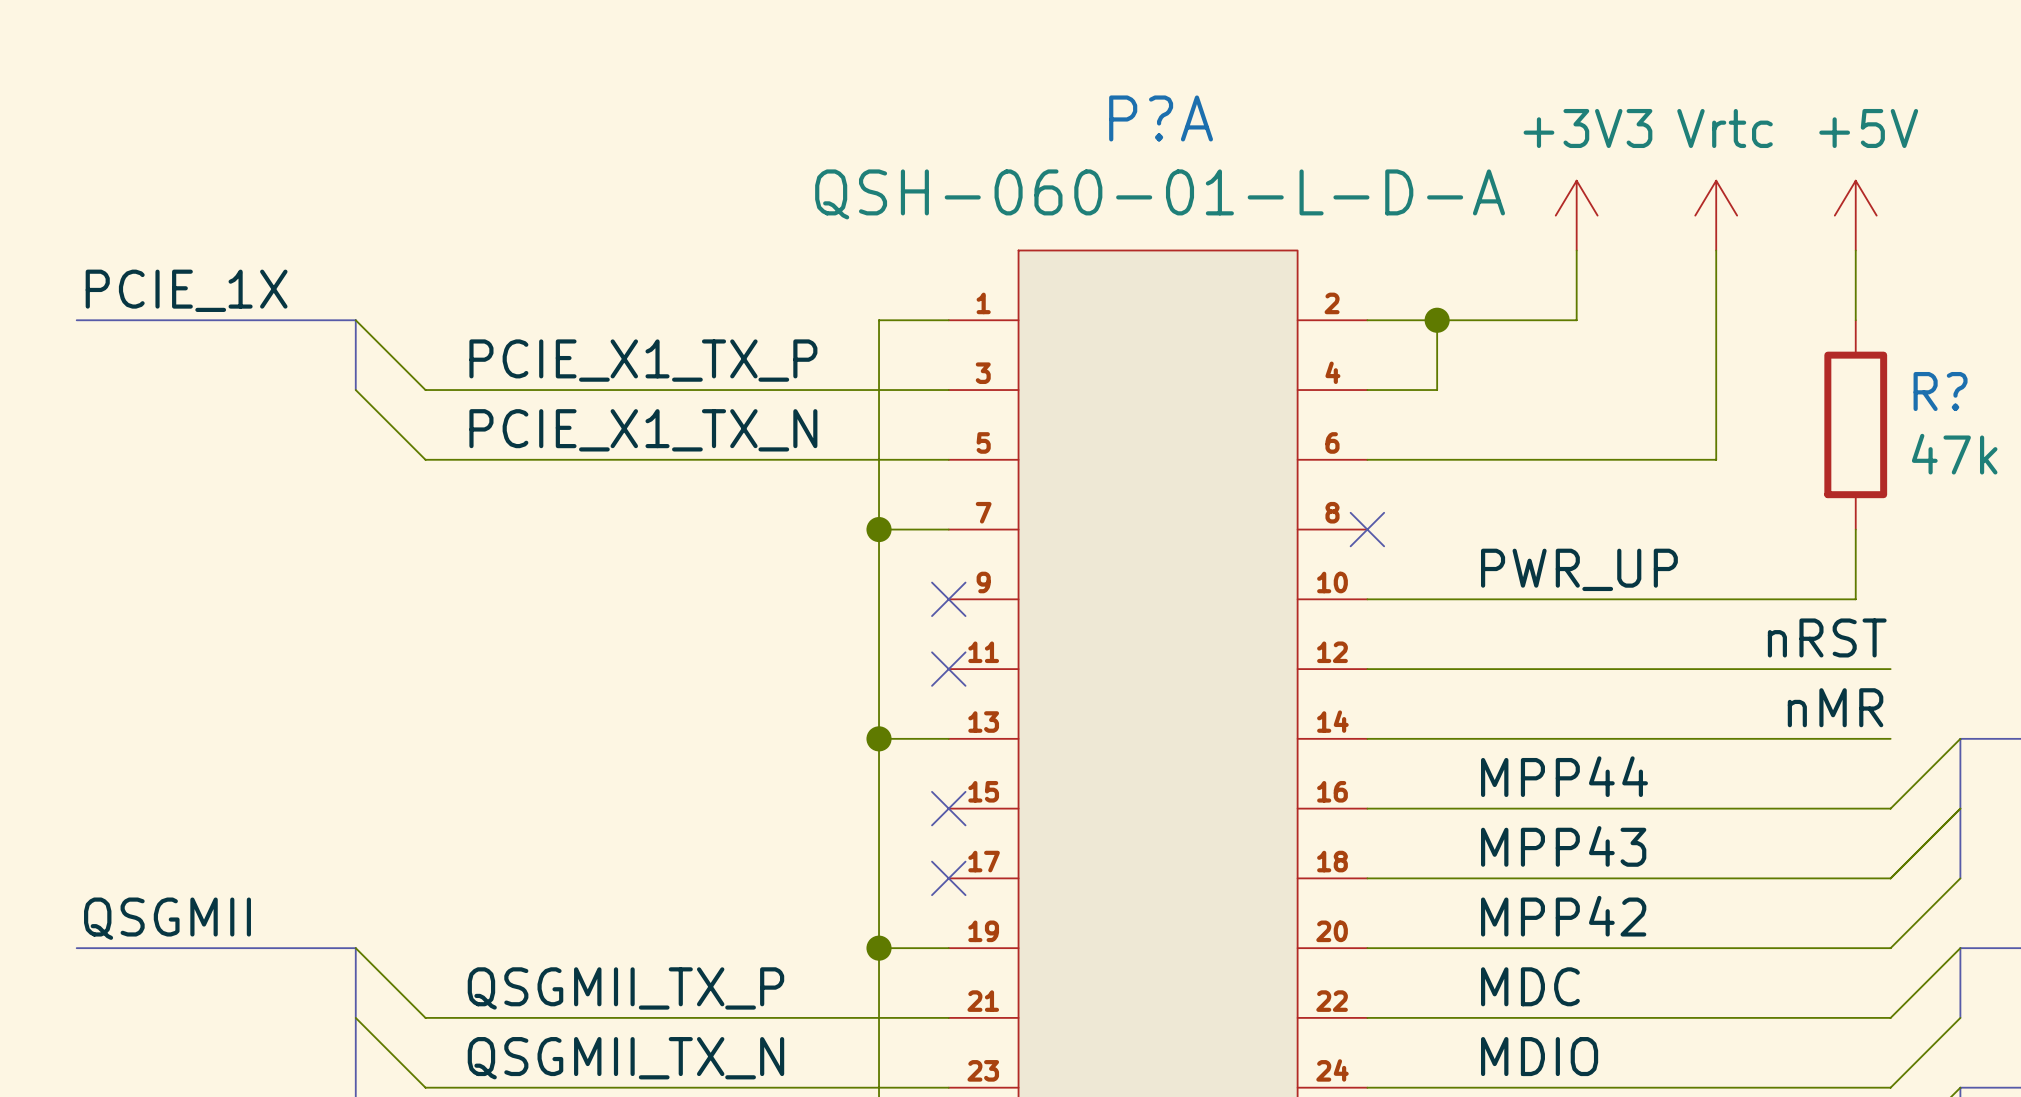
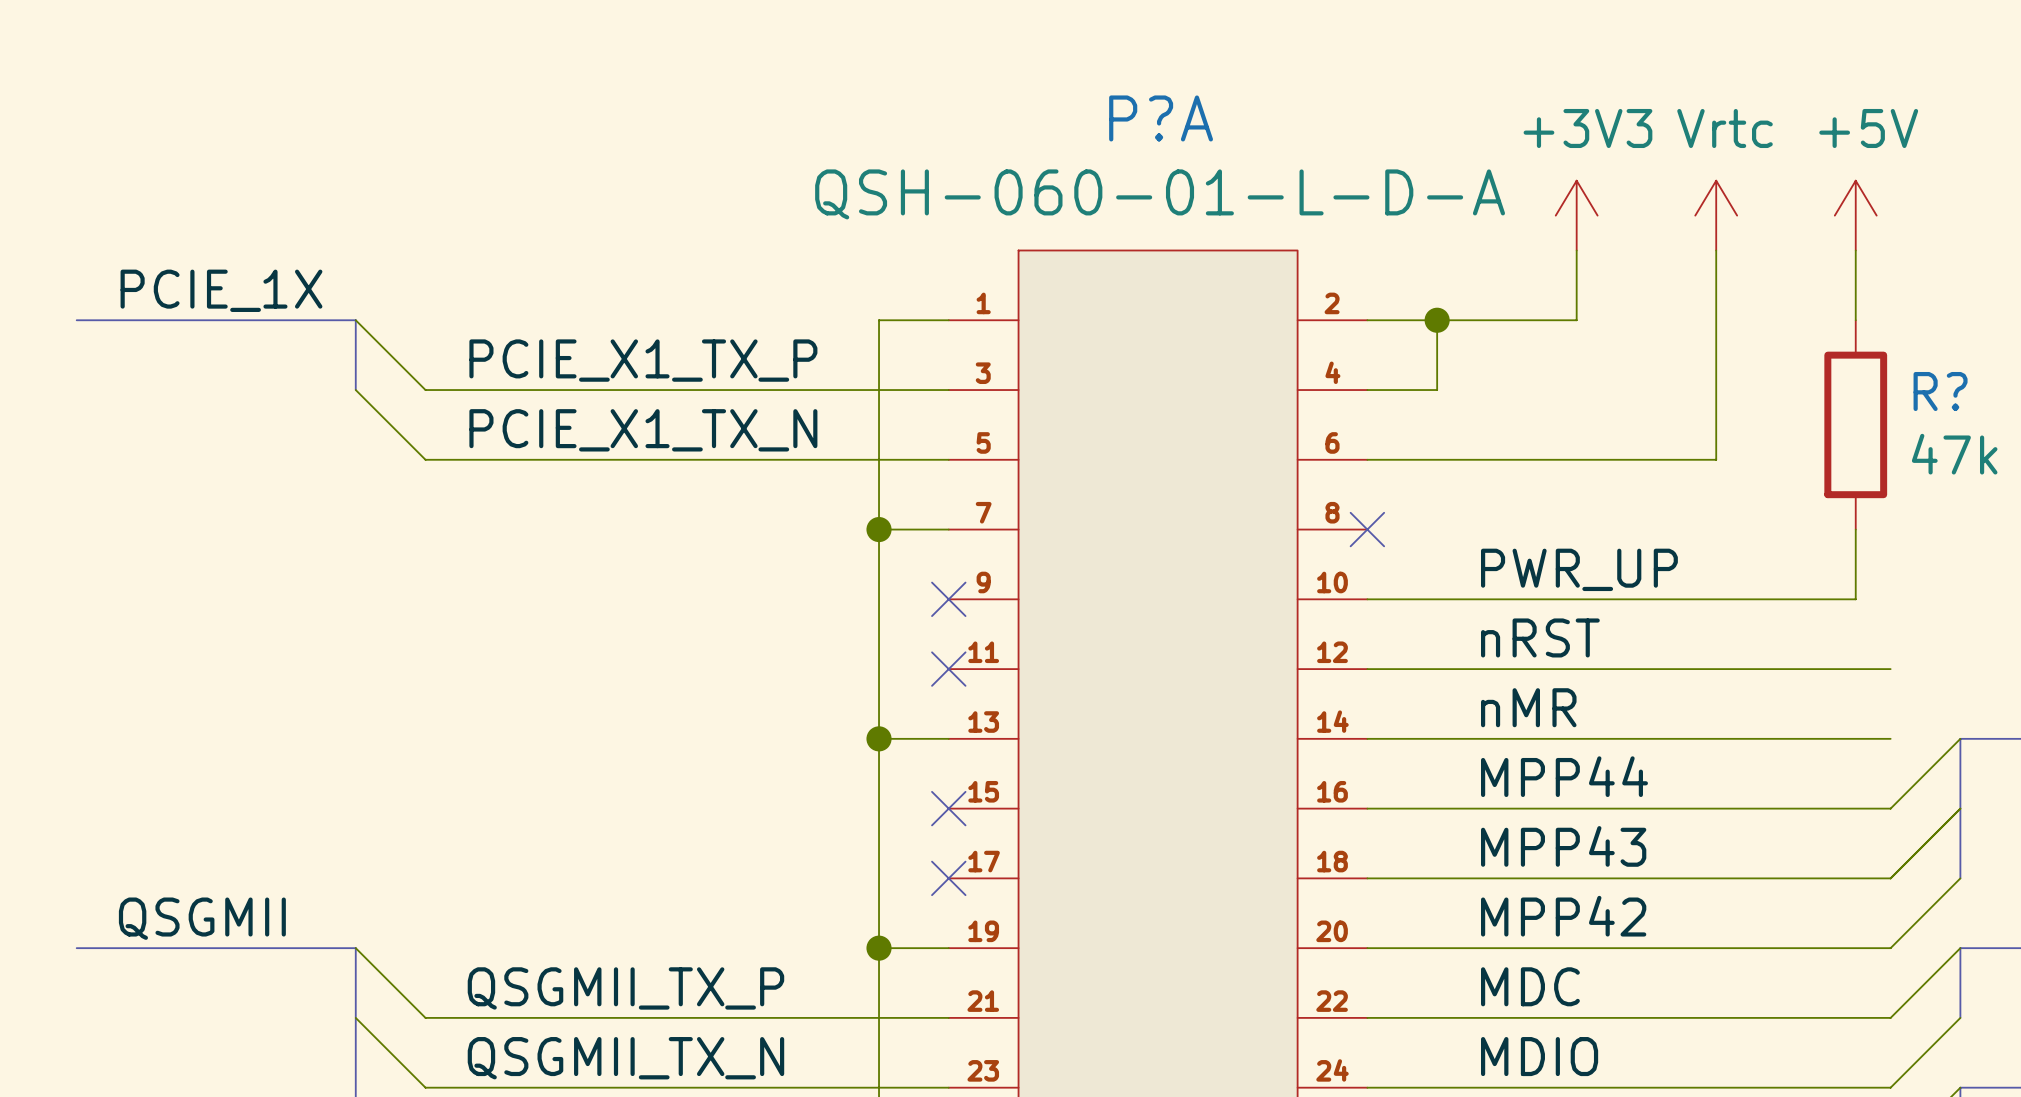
label position: PCIE_1X (186, 290) -> PCIE_1X (221, 290)
label position: nRST (1827, 637) -> nRST (1540, 637)
label position: nMR (1835, 707) -> nMR (1528, 707)
label position: QSGMII (167, 918) -> QSGMII (202, 918)

